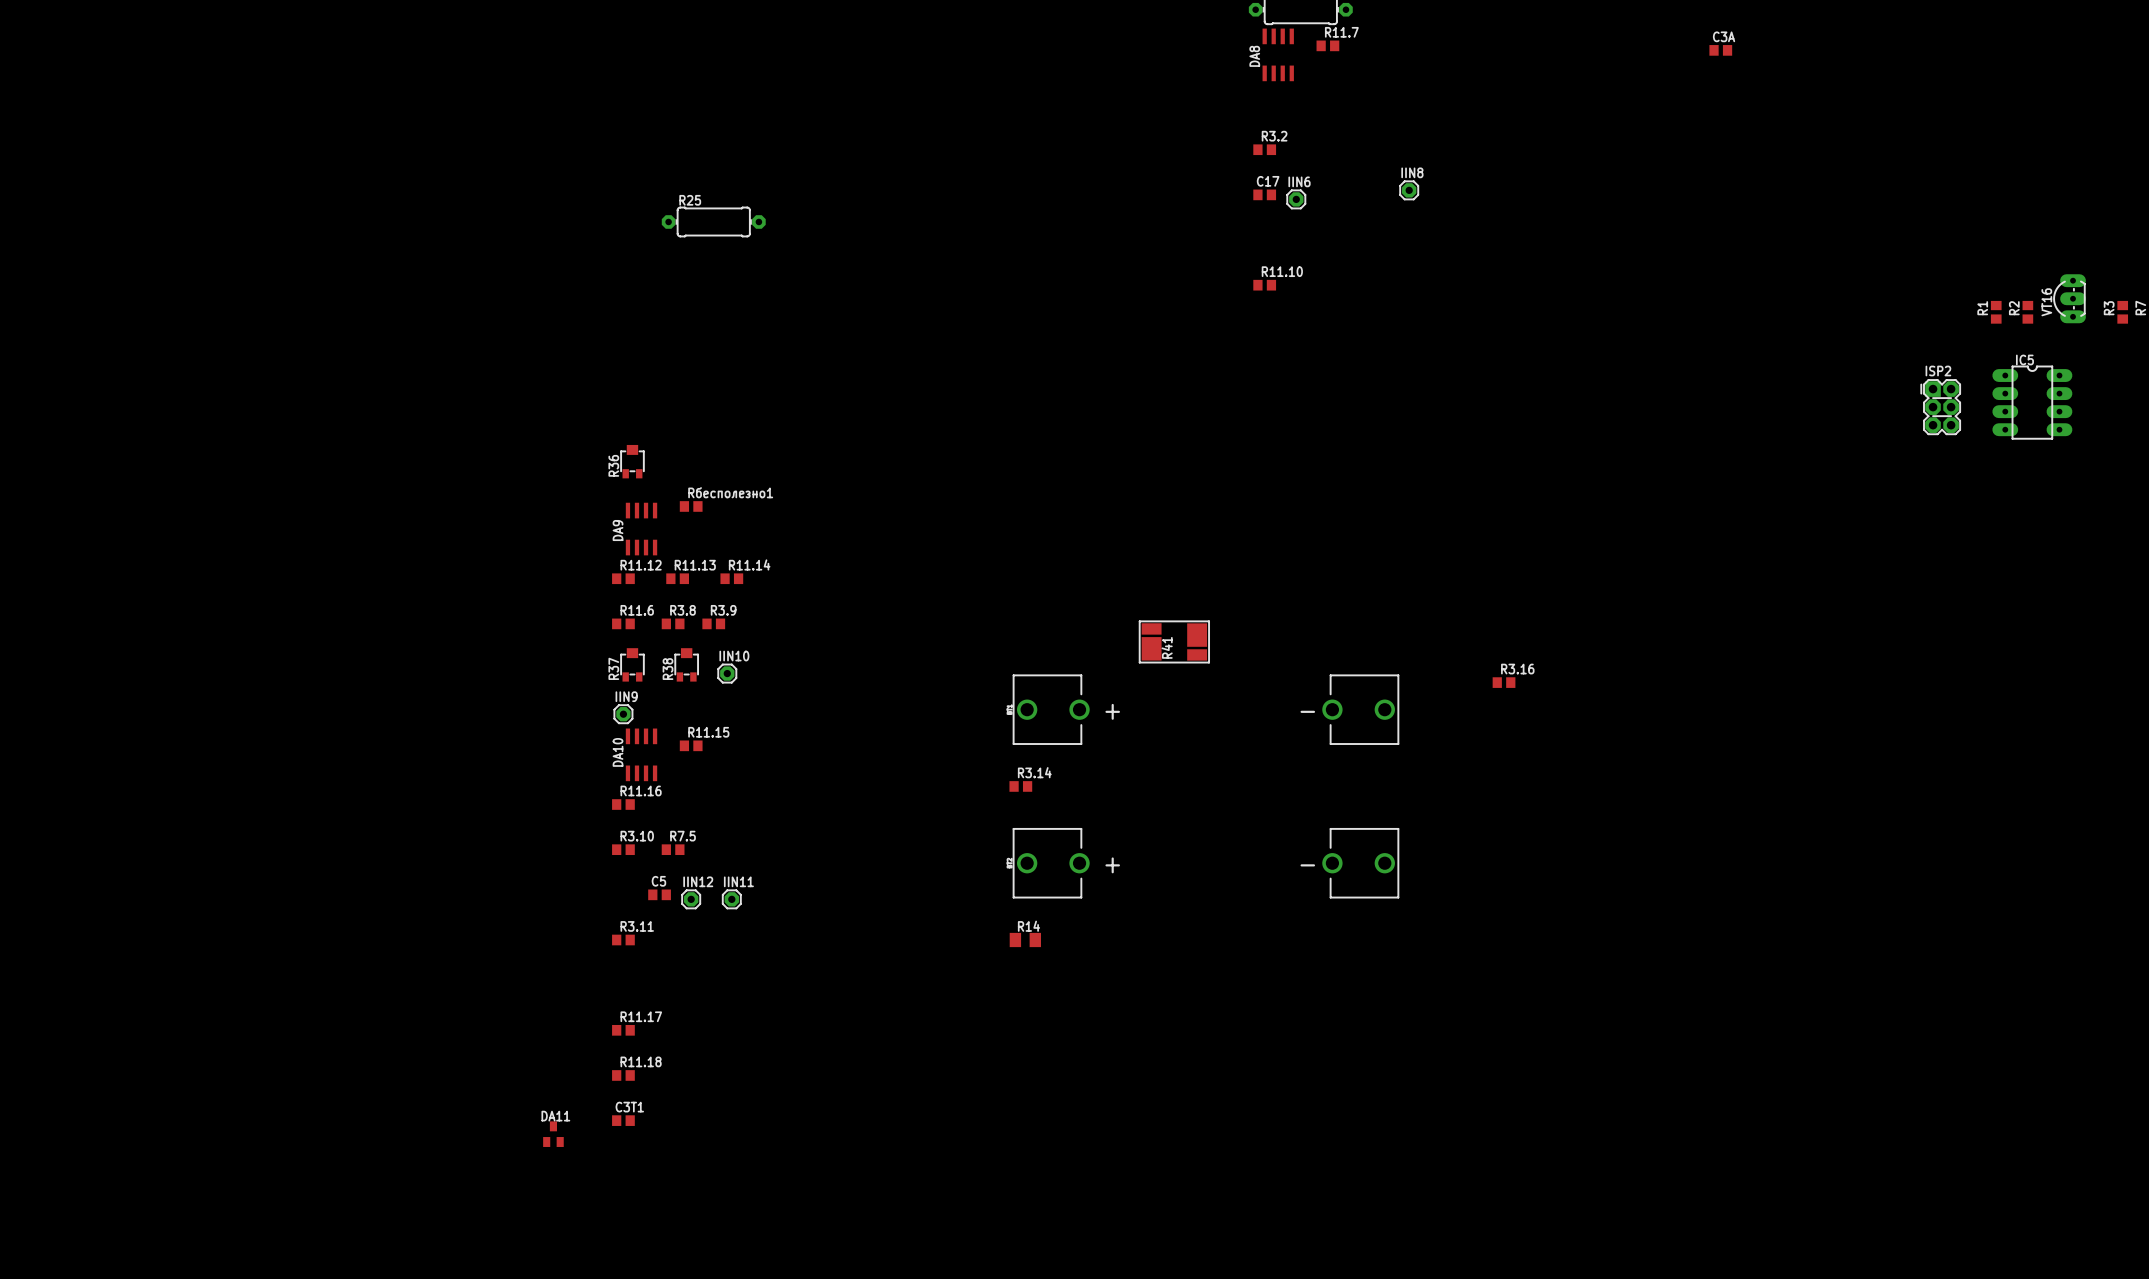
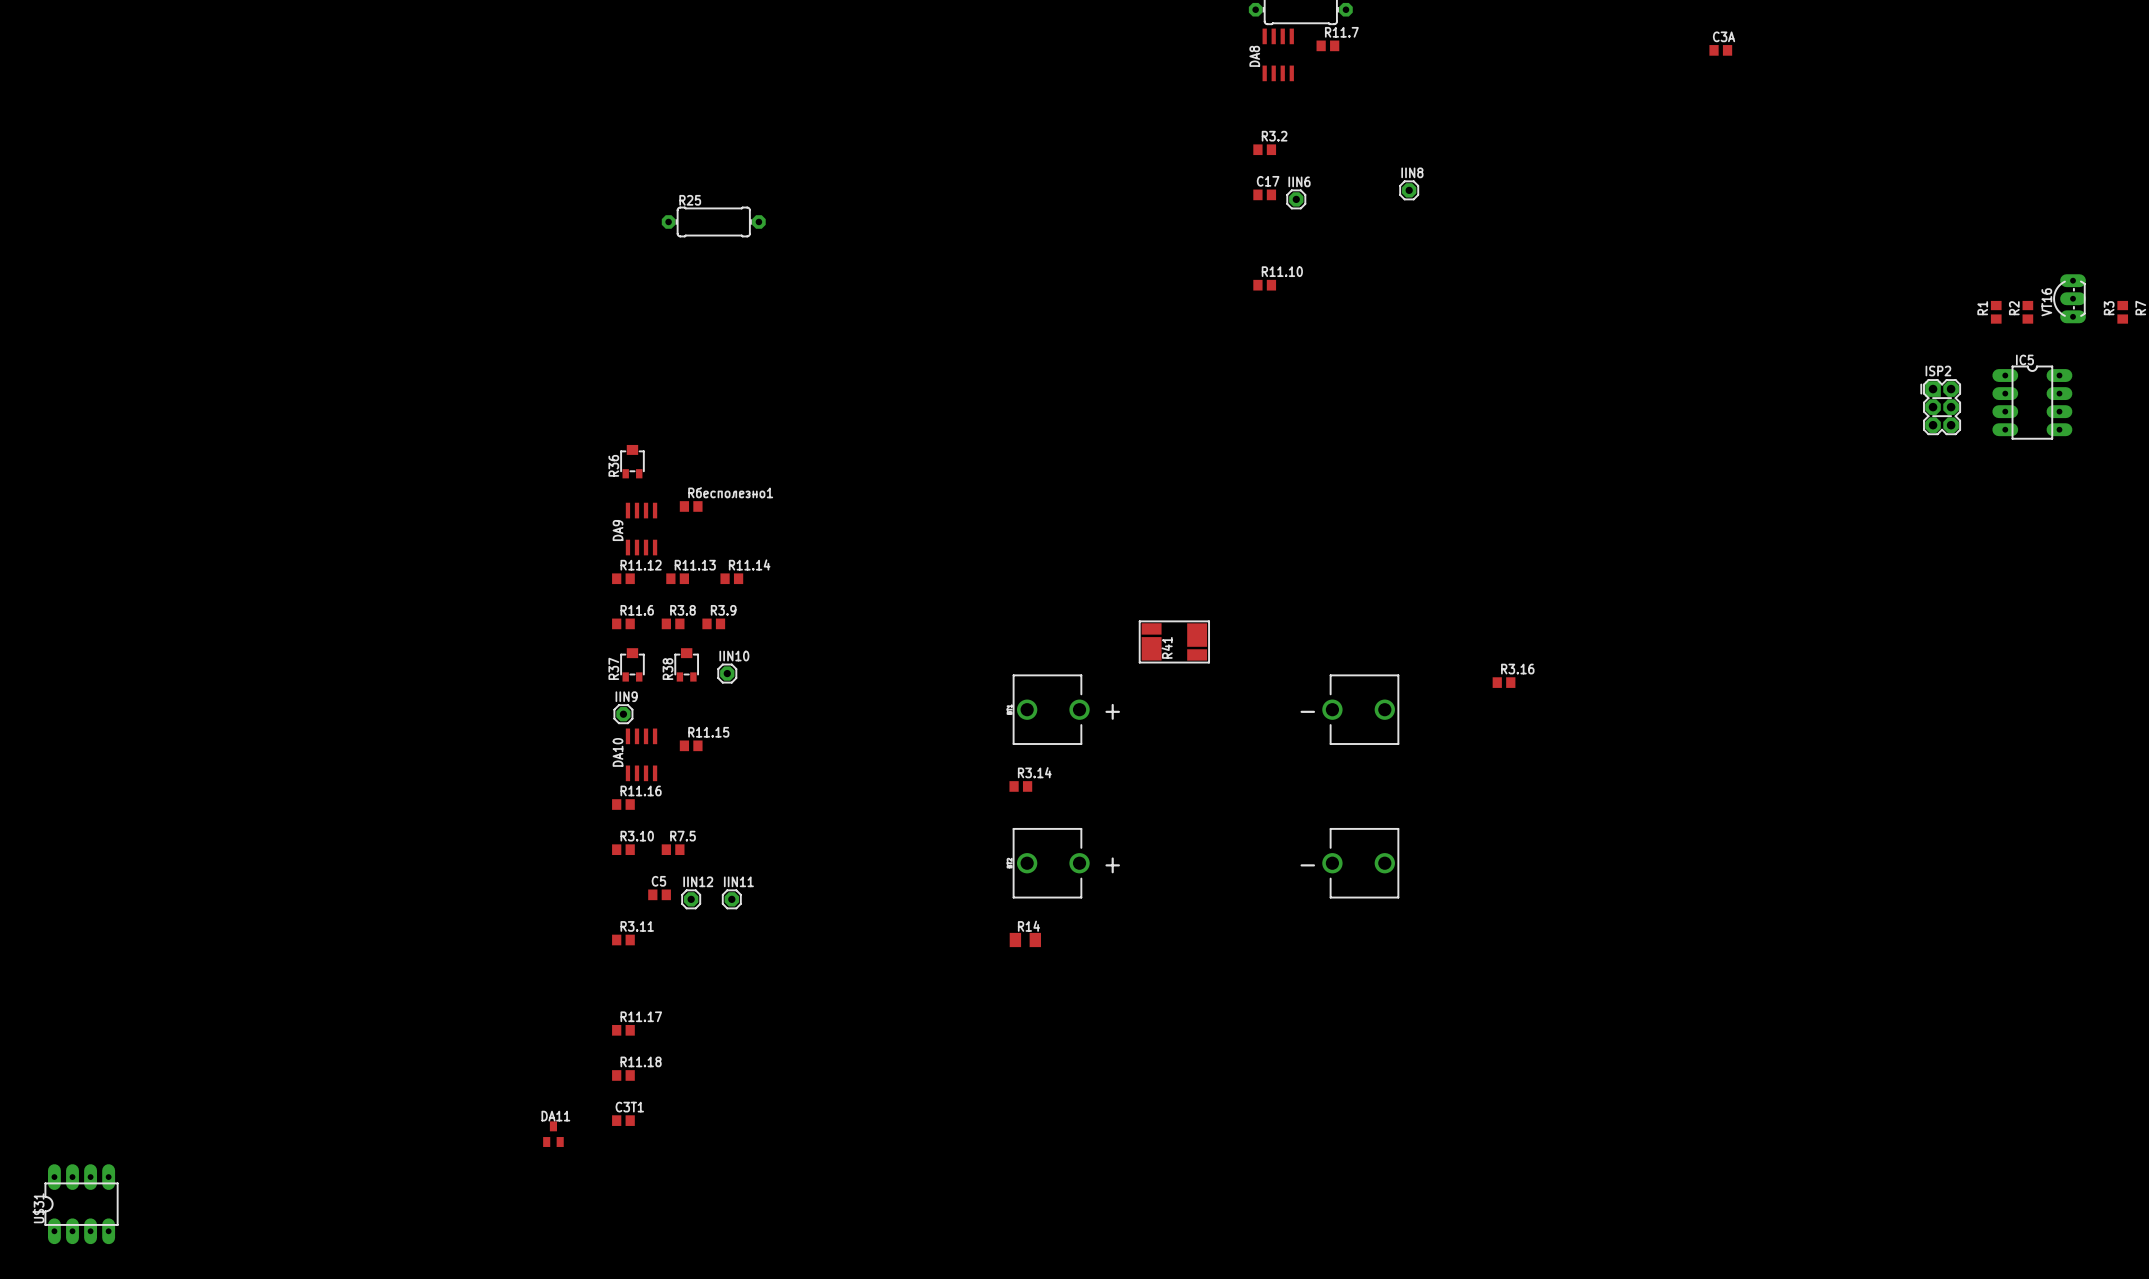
U$31: none -> (81, 1204)

